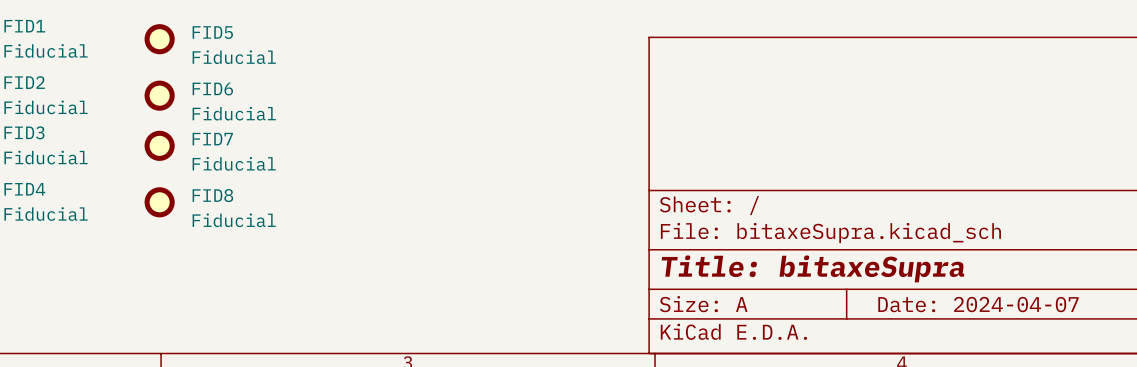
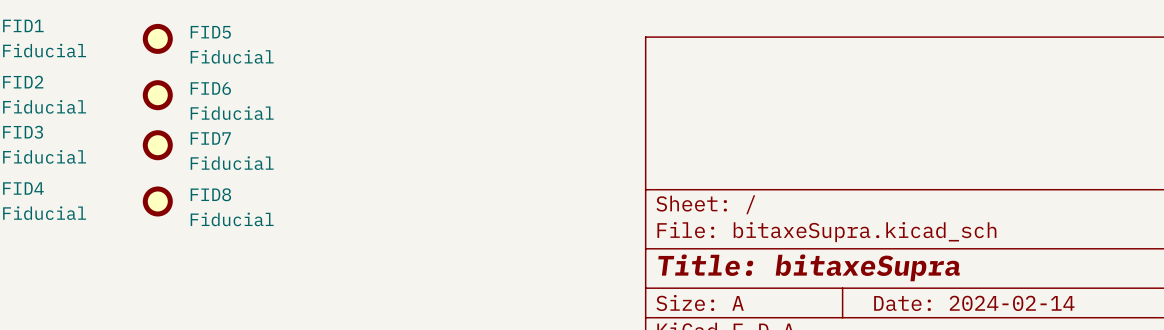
title block: Date: 2024-04-07 (978, 304) -> Date: 2024-02-14 (974, 303)

